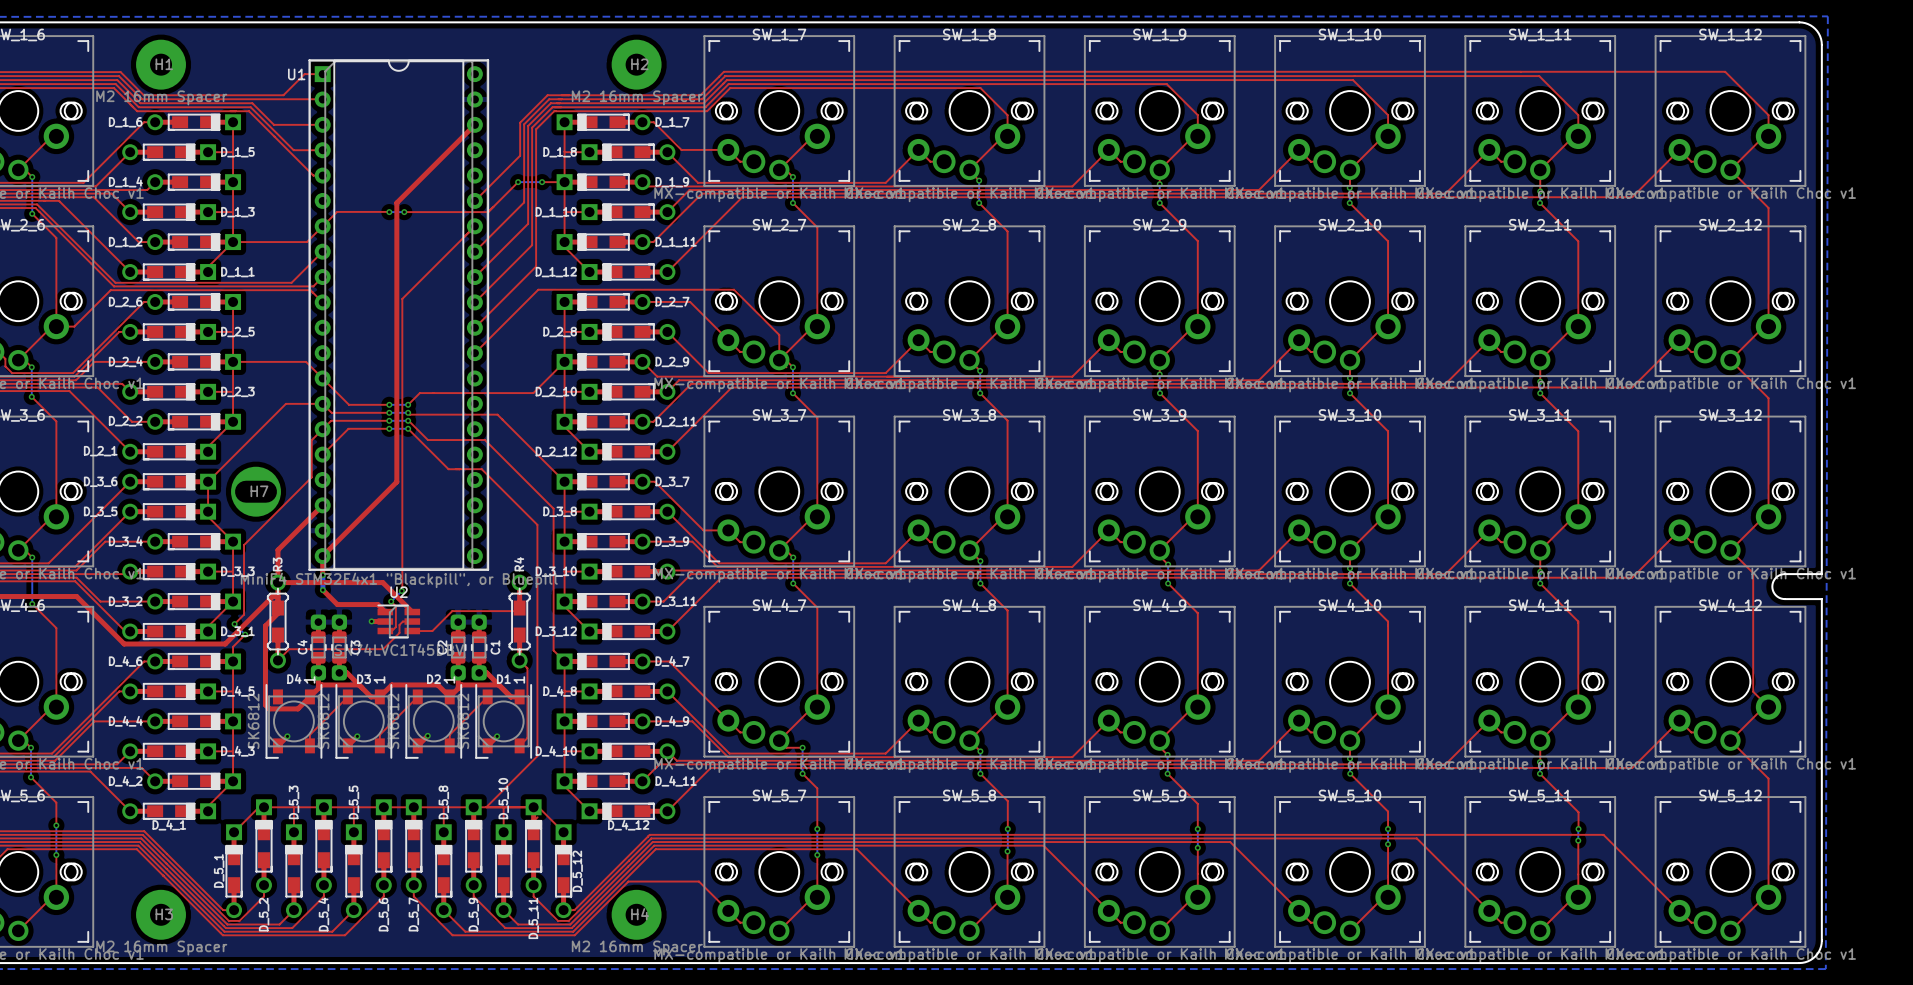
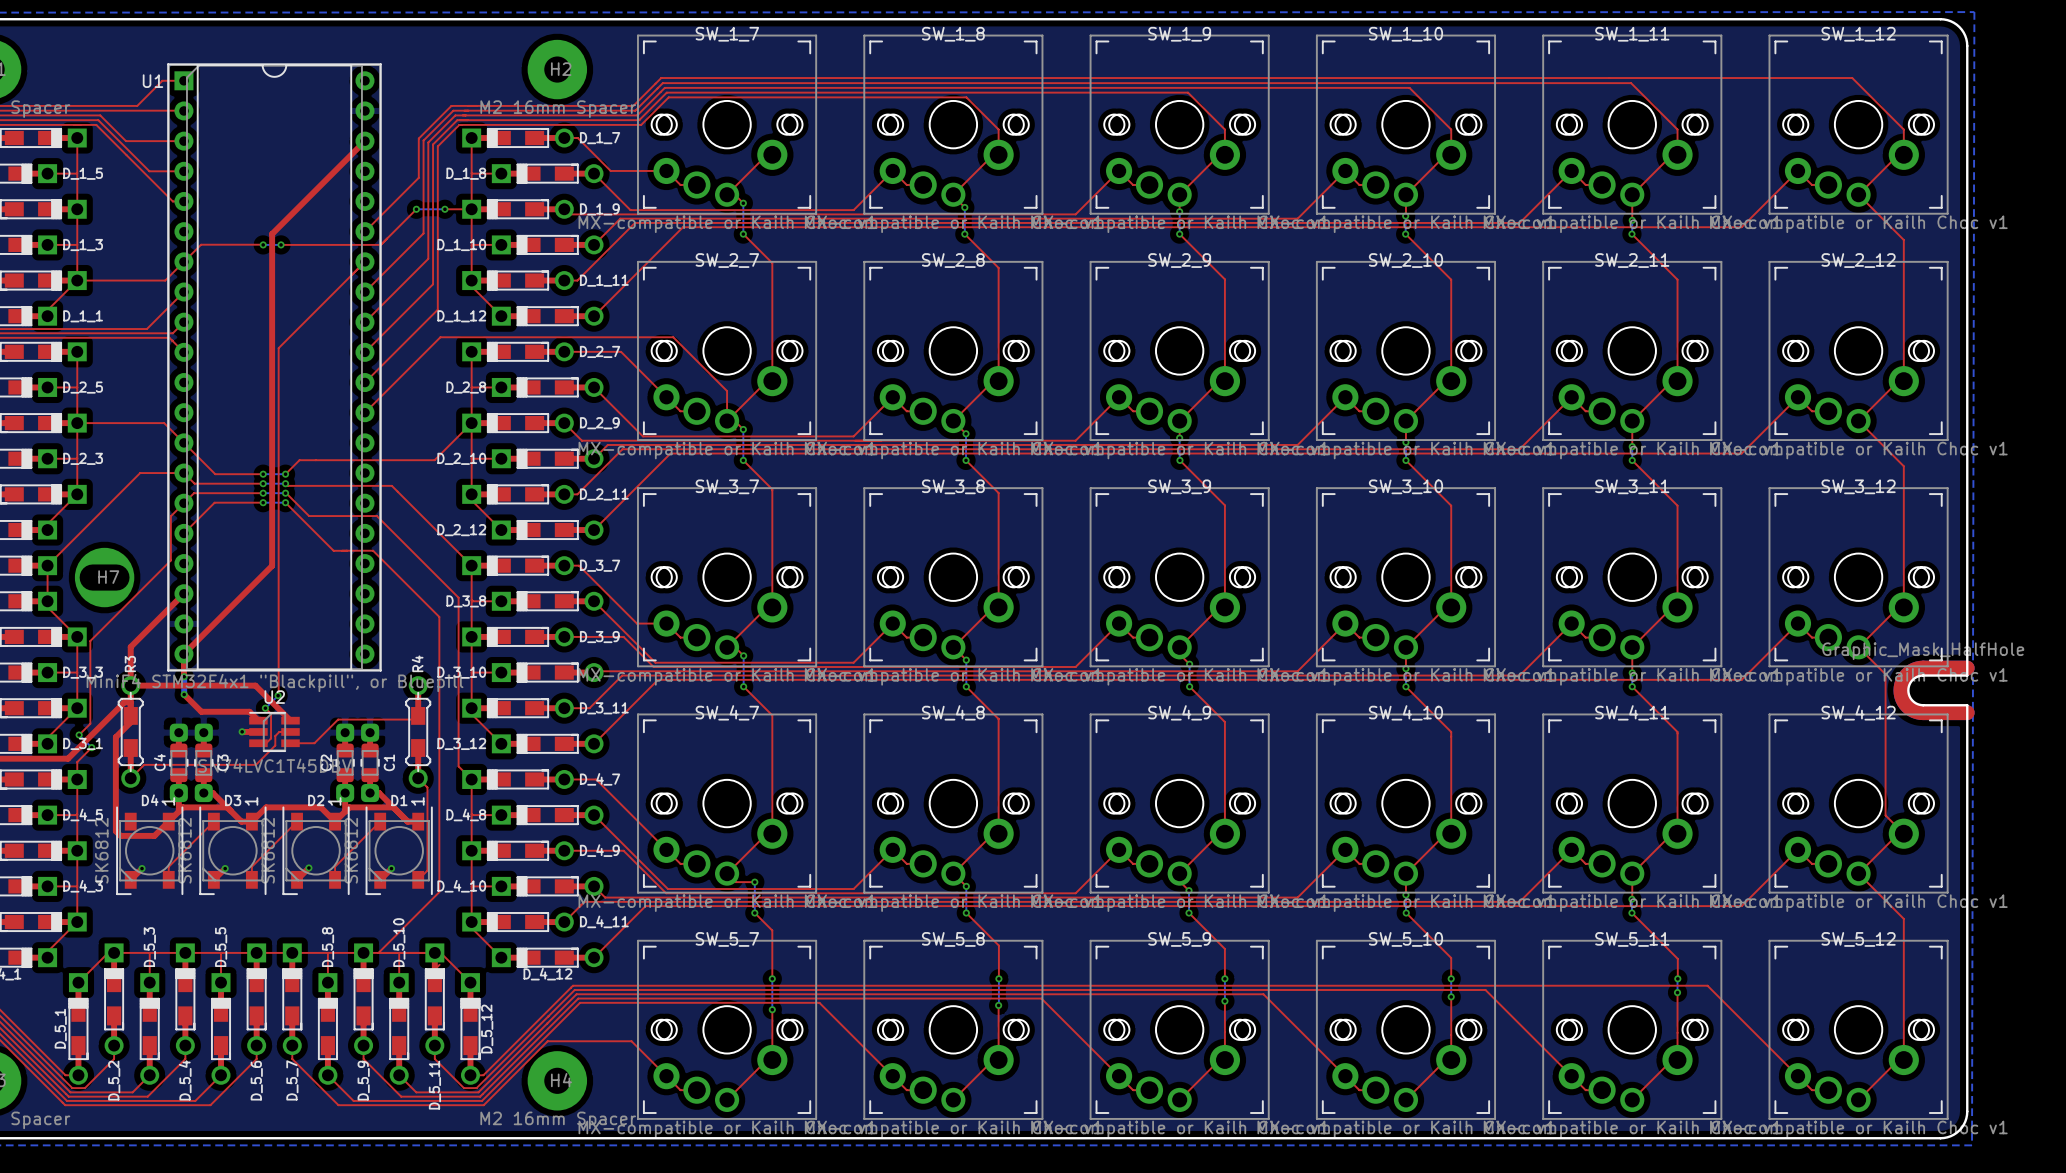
drawing: none -> [1893, 660, 1975, 721]

